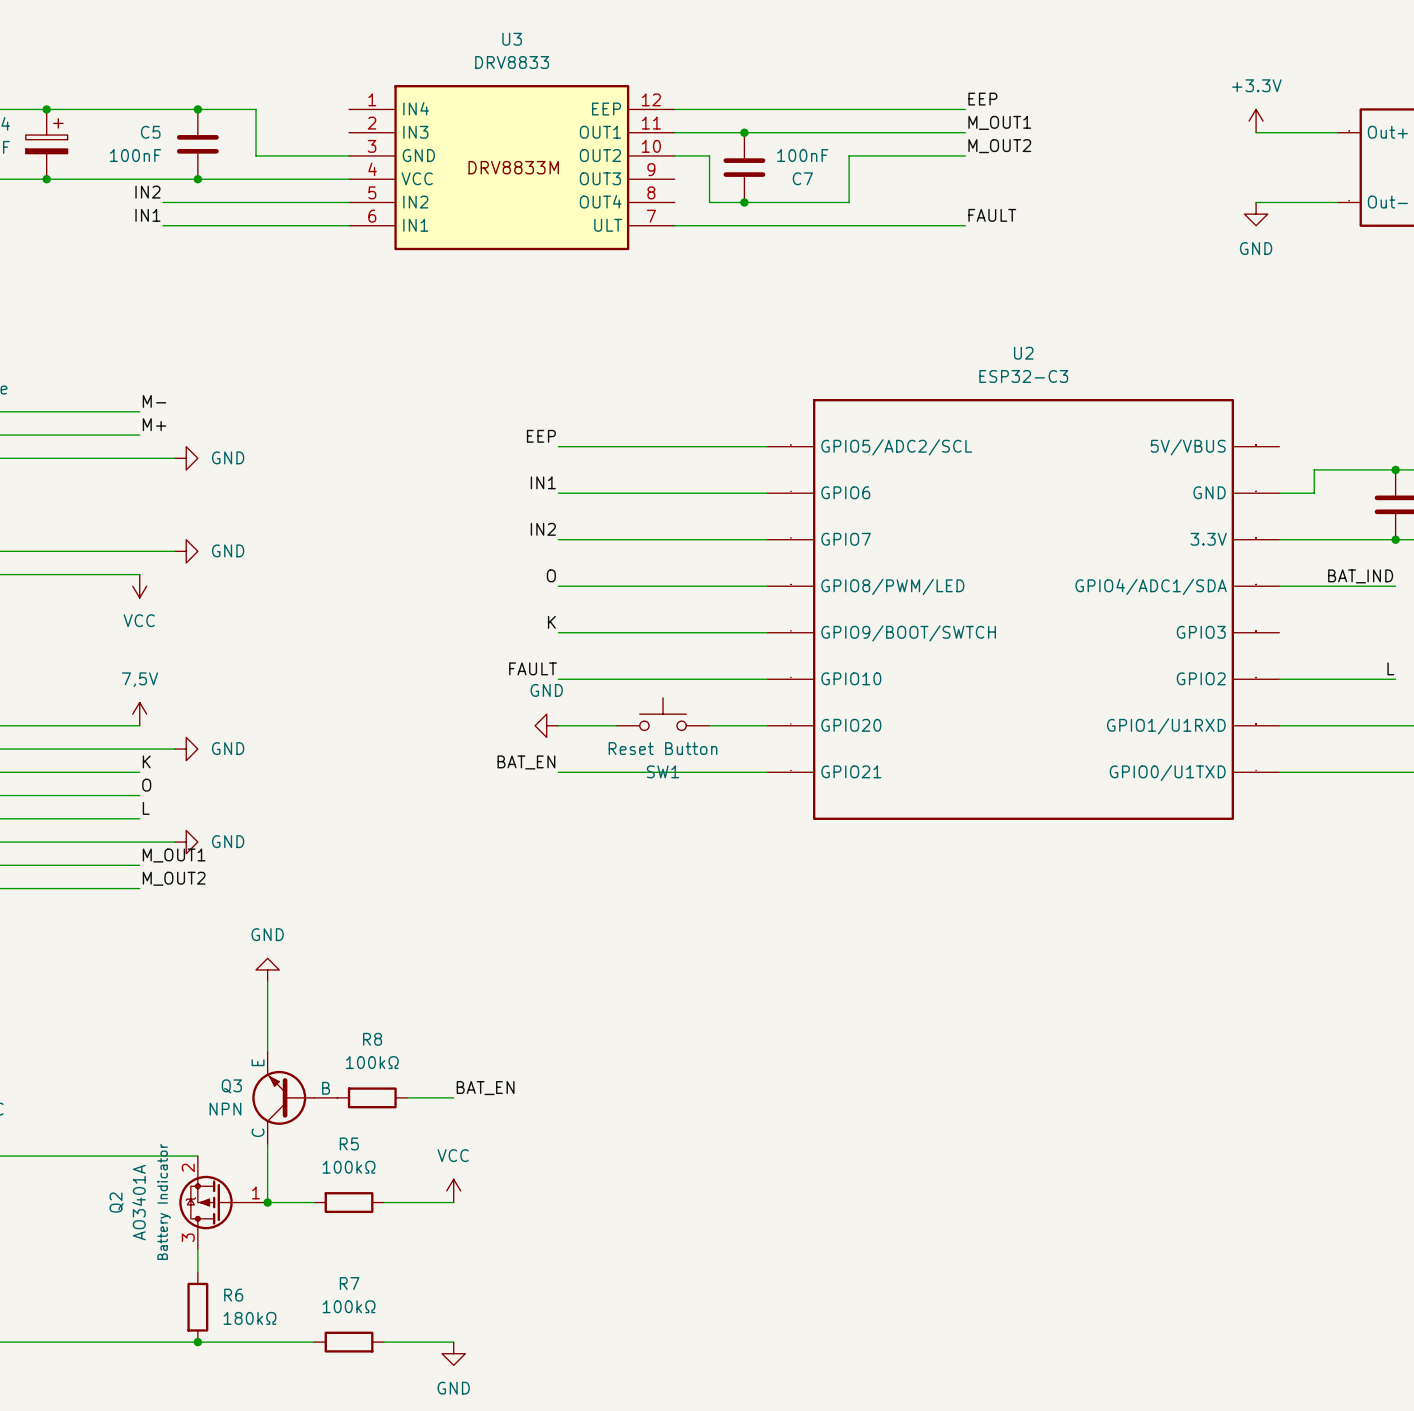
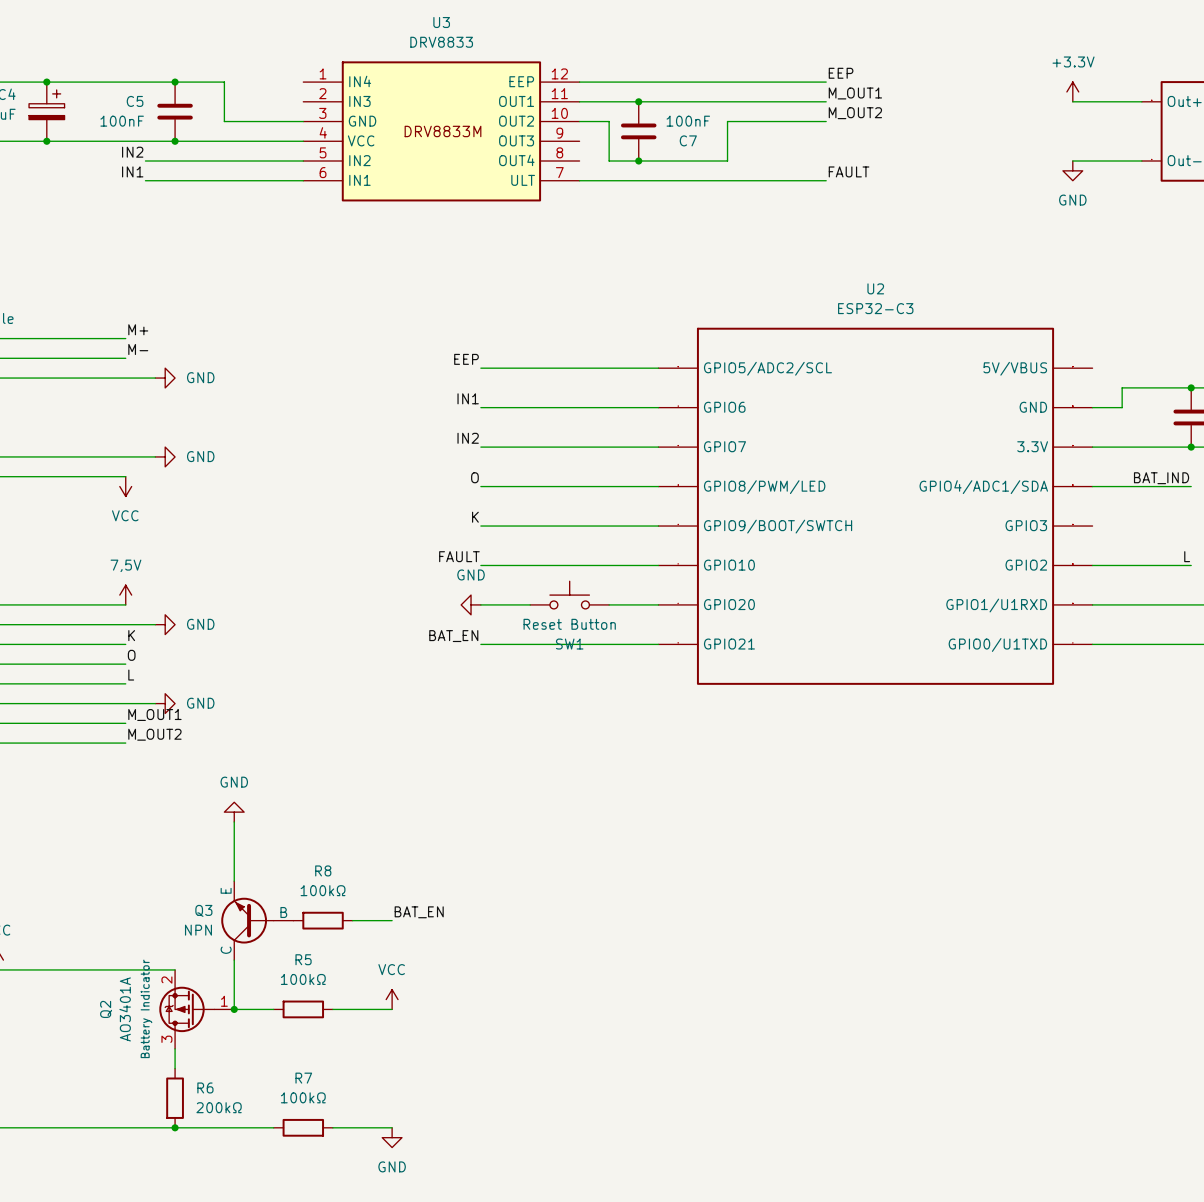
label: M- (154, 401) -> M+ (138, 329)
label: M+ (154, 424) -> M- (138, 349)
R6 value: 180kΩ (250, 1318) -> 200kΩ (219, 1107)

